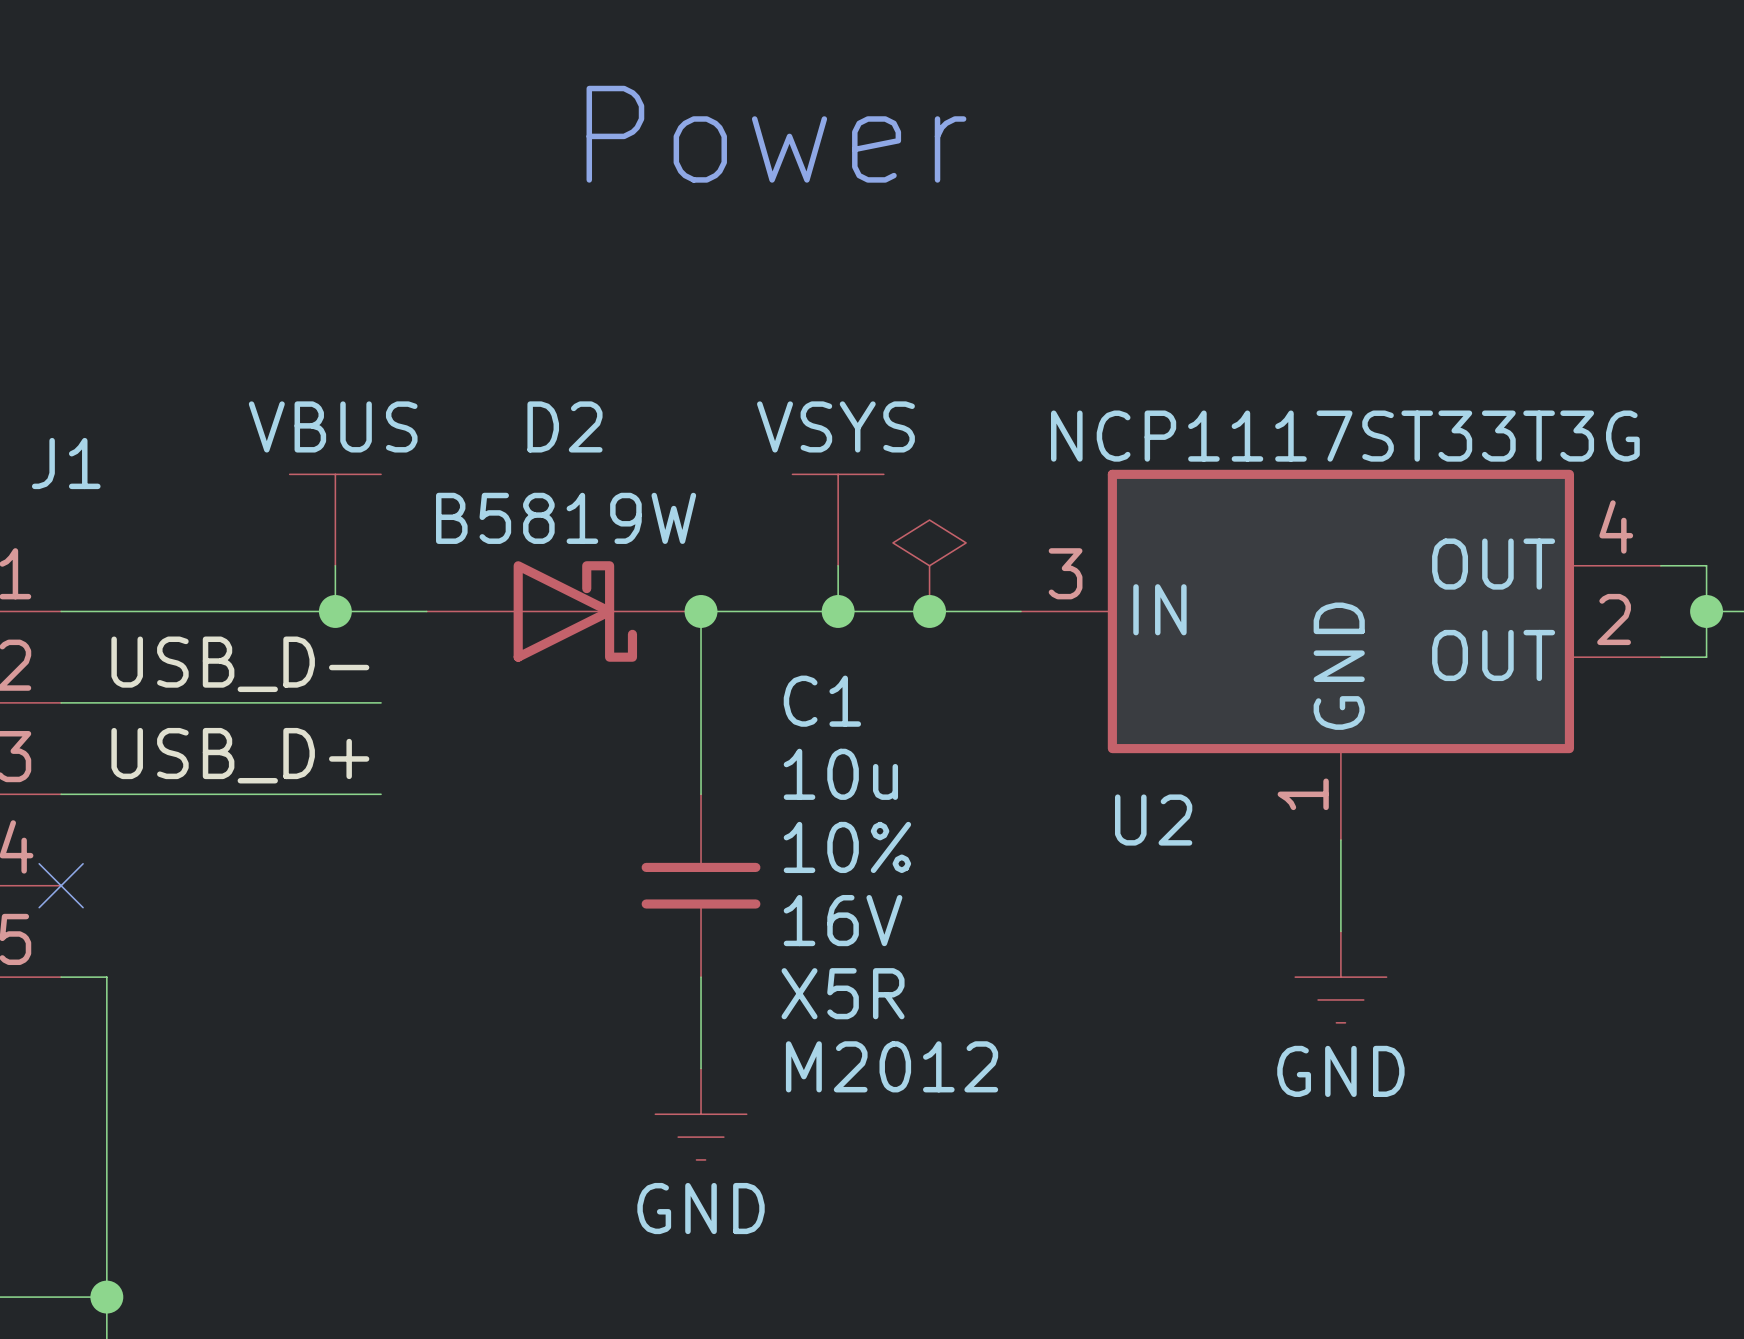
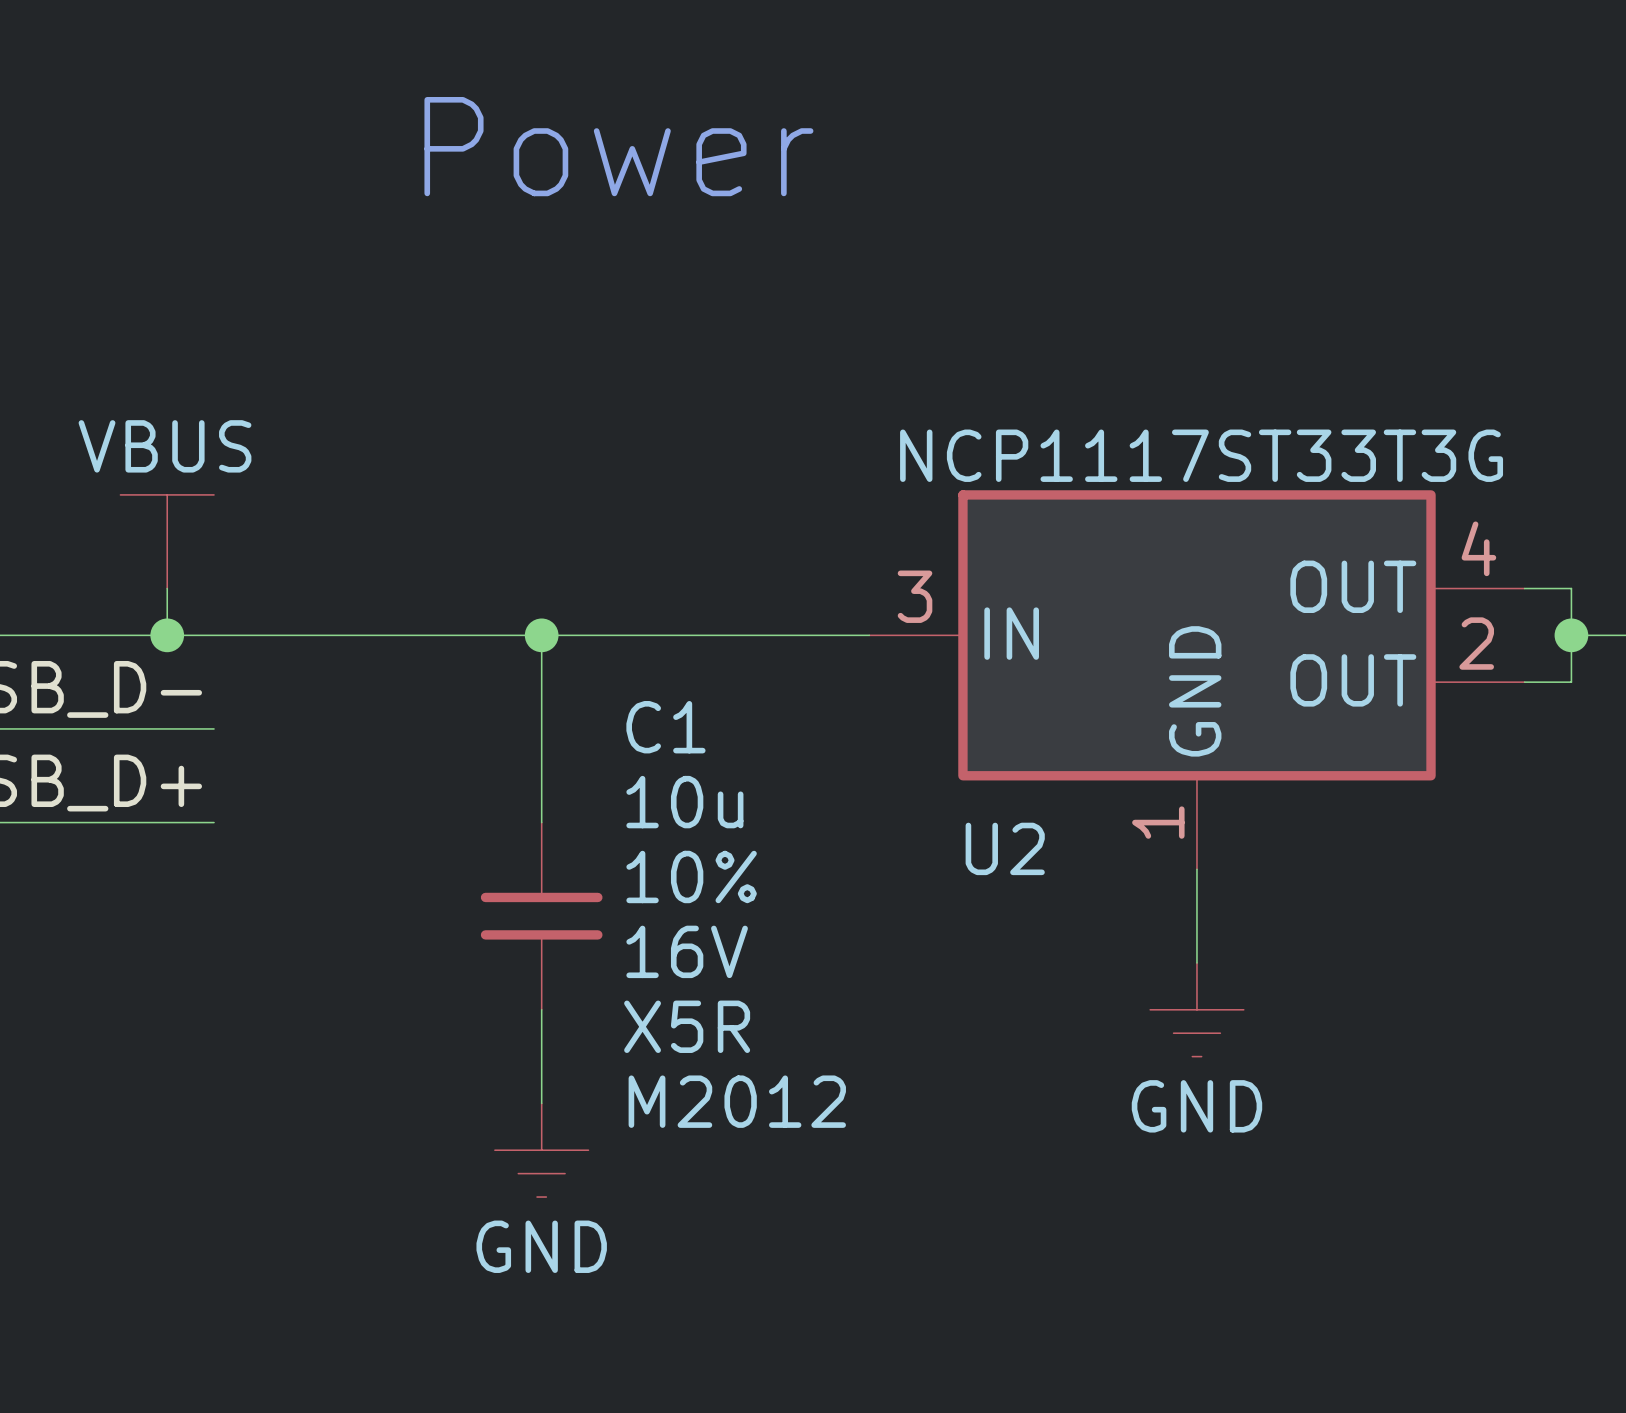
power symbol: VSYS (838, 520) -> none
wire: (838, 565) (838, 611) -> none
power symbol: (929, 565) -> none
D2: B5819W (563, 611) -> none
junction: (838, 611) -> none
junction: (929, 611) -> none

